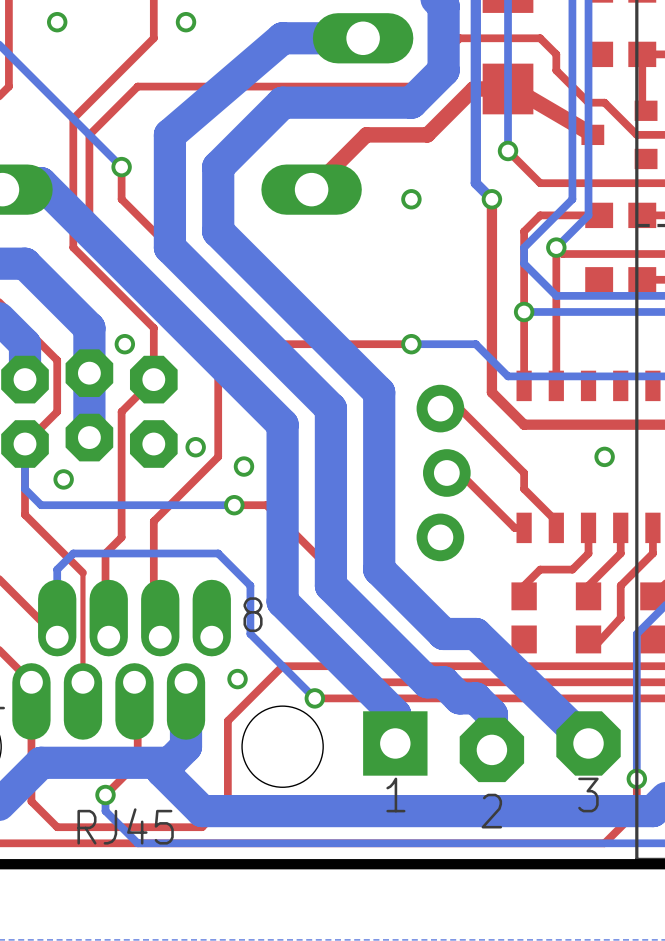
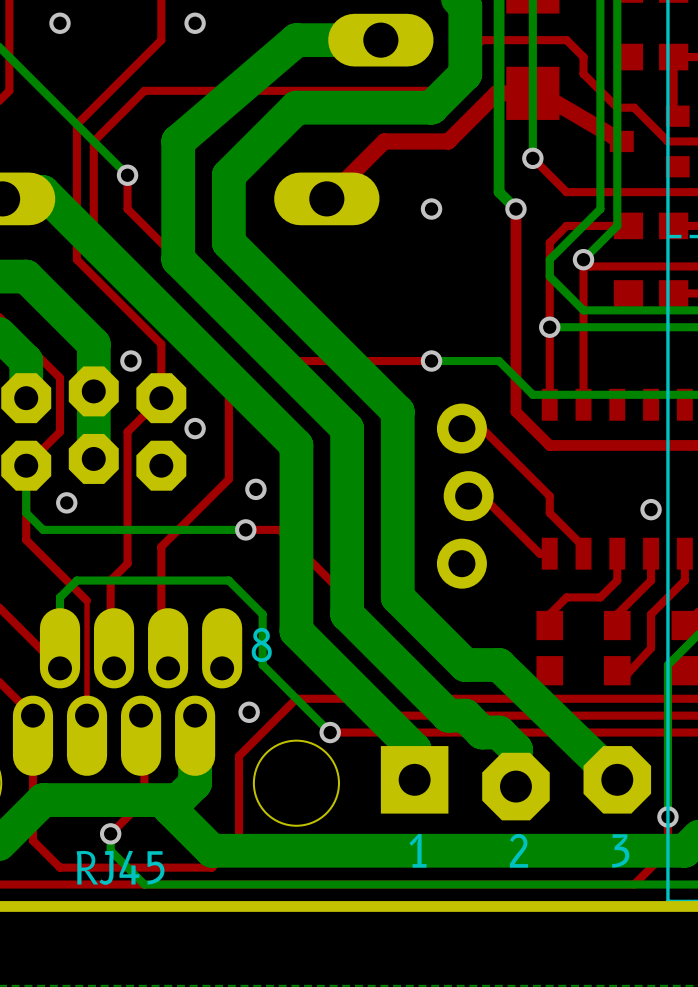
via position: (195, 447) -> (195, 428)
via position: (604, 456) -> (651, 509)
part footprint: [363, 711, 621, 783] -> [380, 746, 652, 821]

